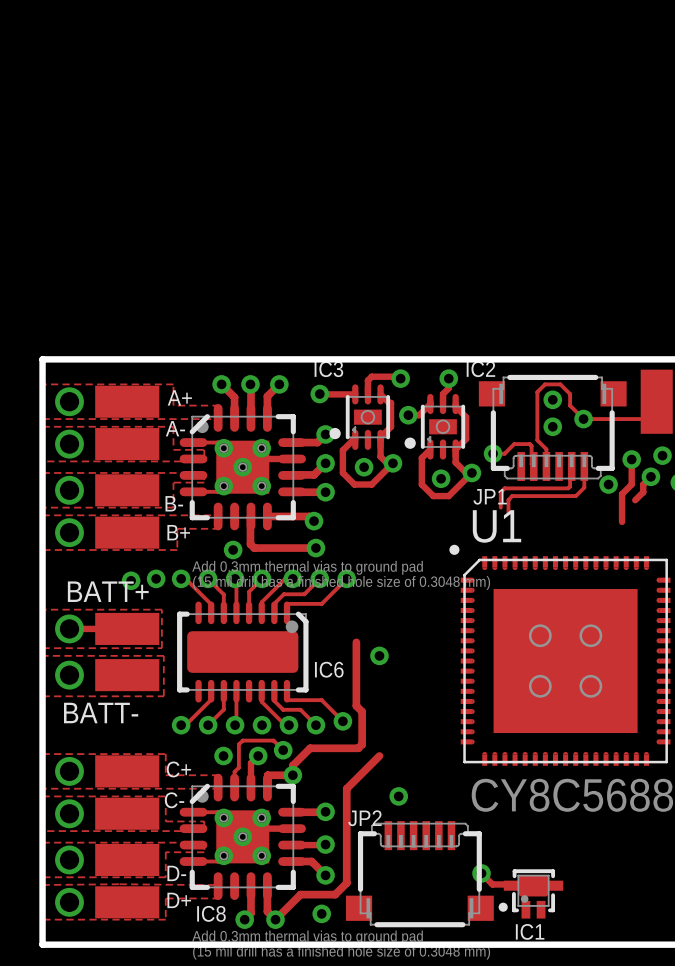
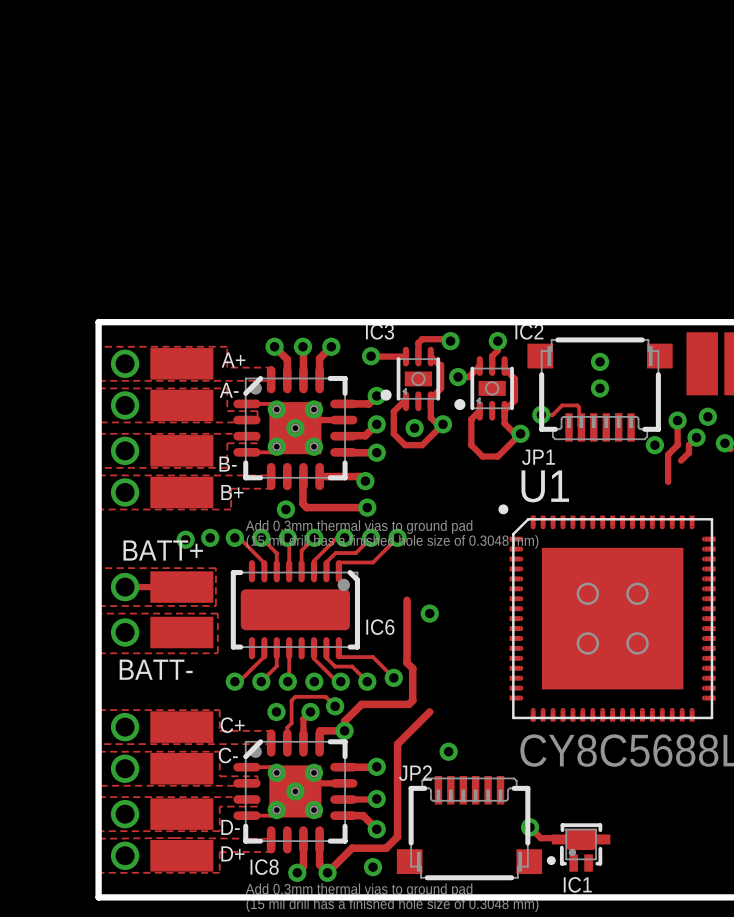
via: (583, 419) -> none
track: (654, 419) (583, 419) (570, 405) (570, 394) (560, 384) (545, 384) (537, 392) (537, 440) (546, 449) (546, 466) -> none
track: (571, 466) (570, 486) (568, 488) (504, 488) (500, 492) (500, 507) -> none
track: (584, 466) (584, 487) (575, 496) (512, 496) (508, 499) (508, 513) -> none
via: (441, 478) -> none

